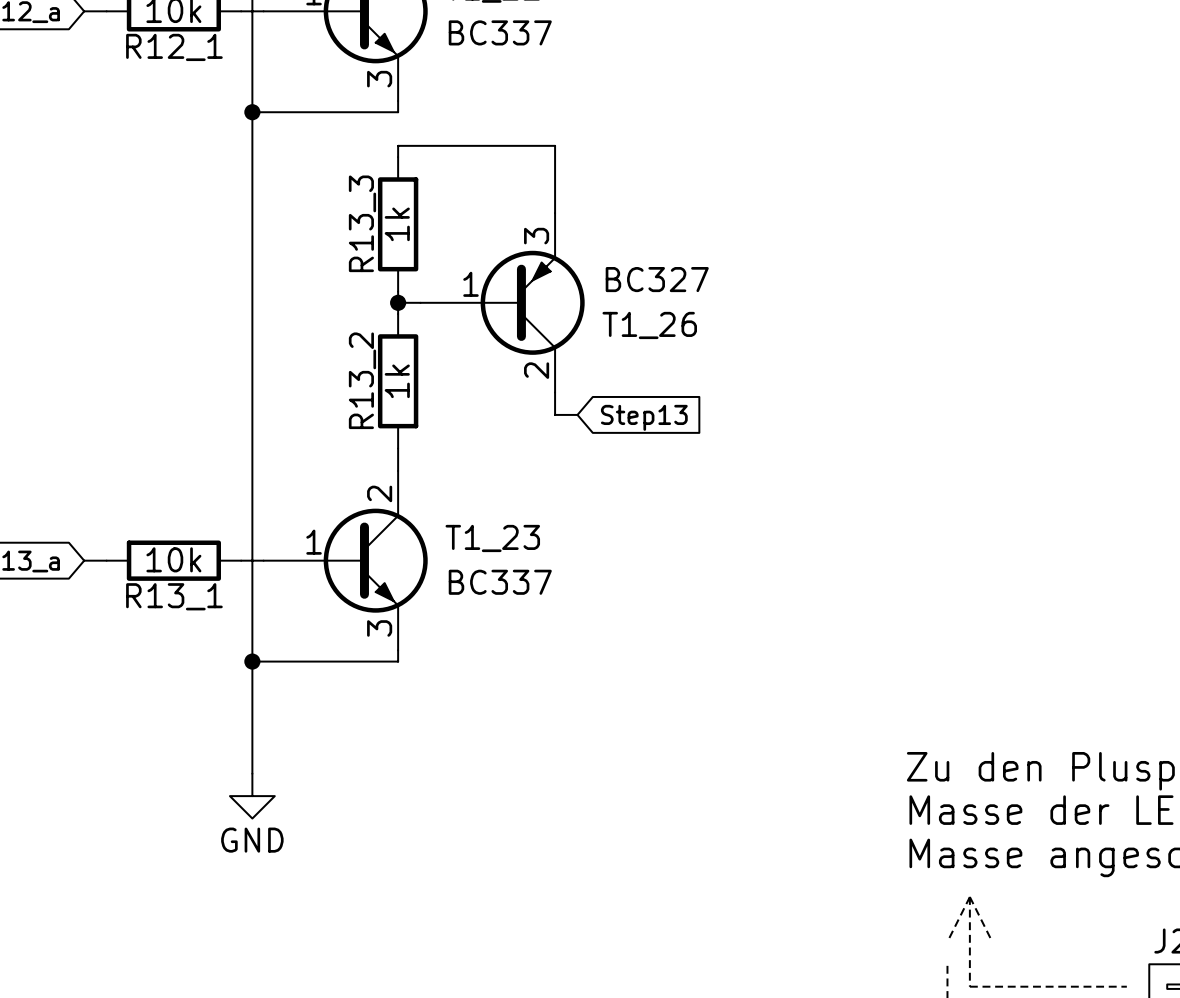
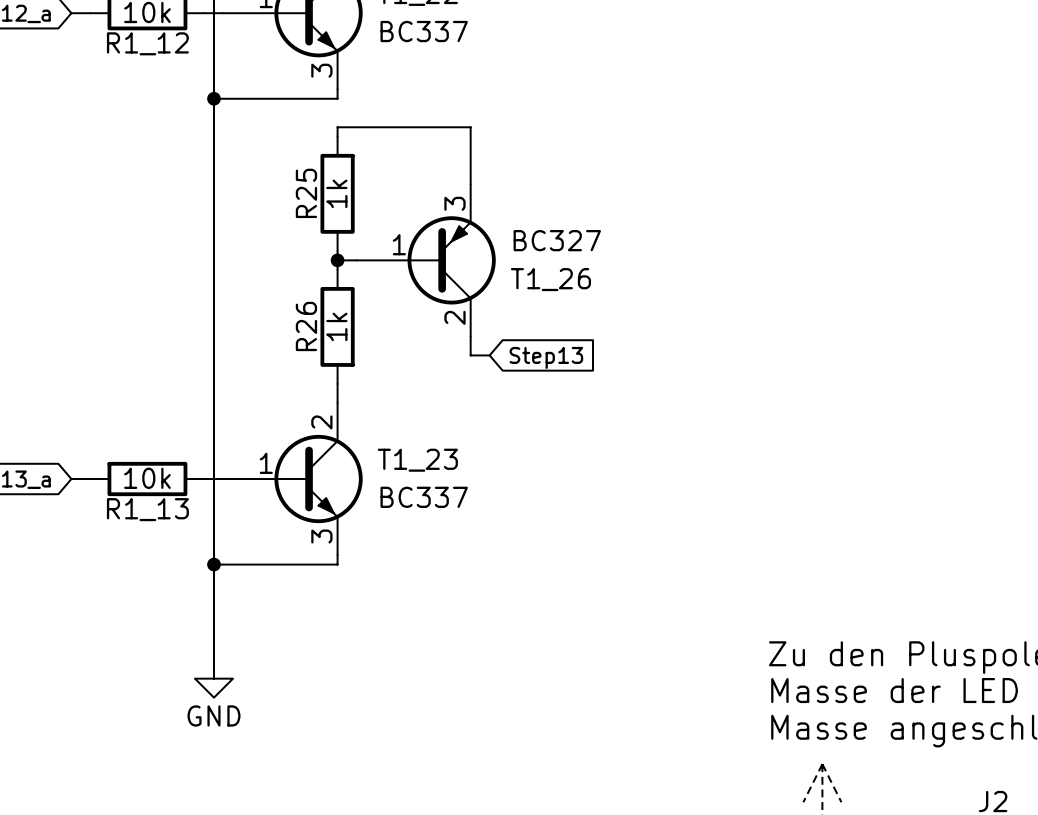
R12_1 name: R12_1 (174, 47) -> R1_12 (147, 43)
R13_3 name: R13_3 (362, 223) -> R25 (306, 193)
R13_2 name: R13_2 (362, 380) -> R26 (306, 326)
R13_1 name: R13_1 (174, 596) -> R1_13 (147, 509)

